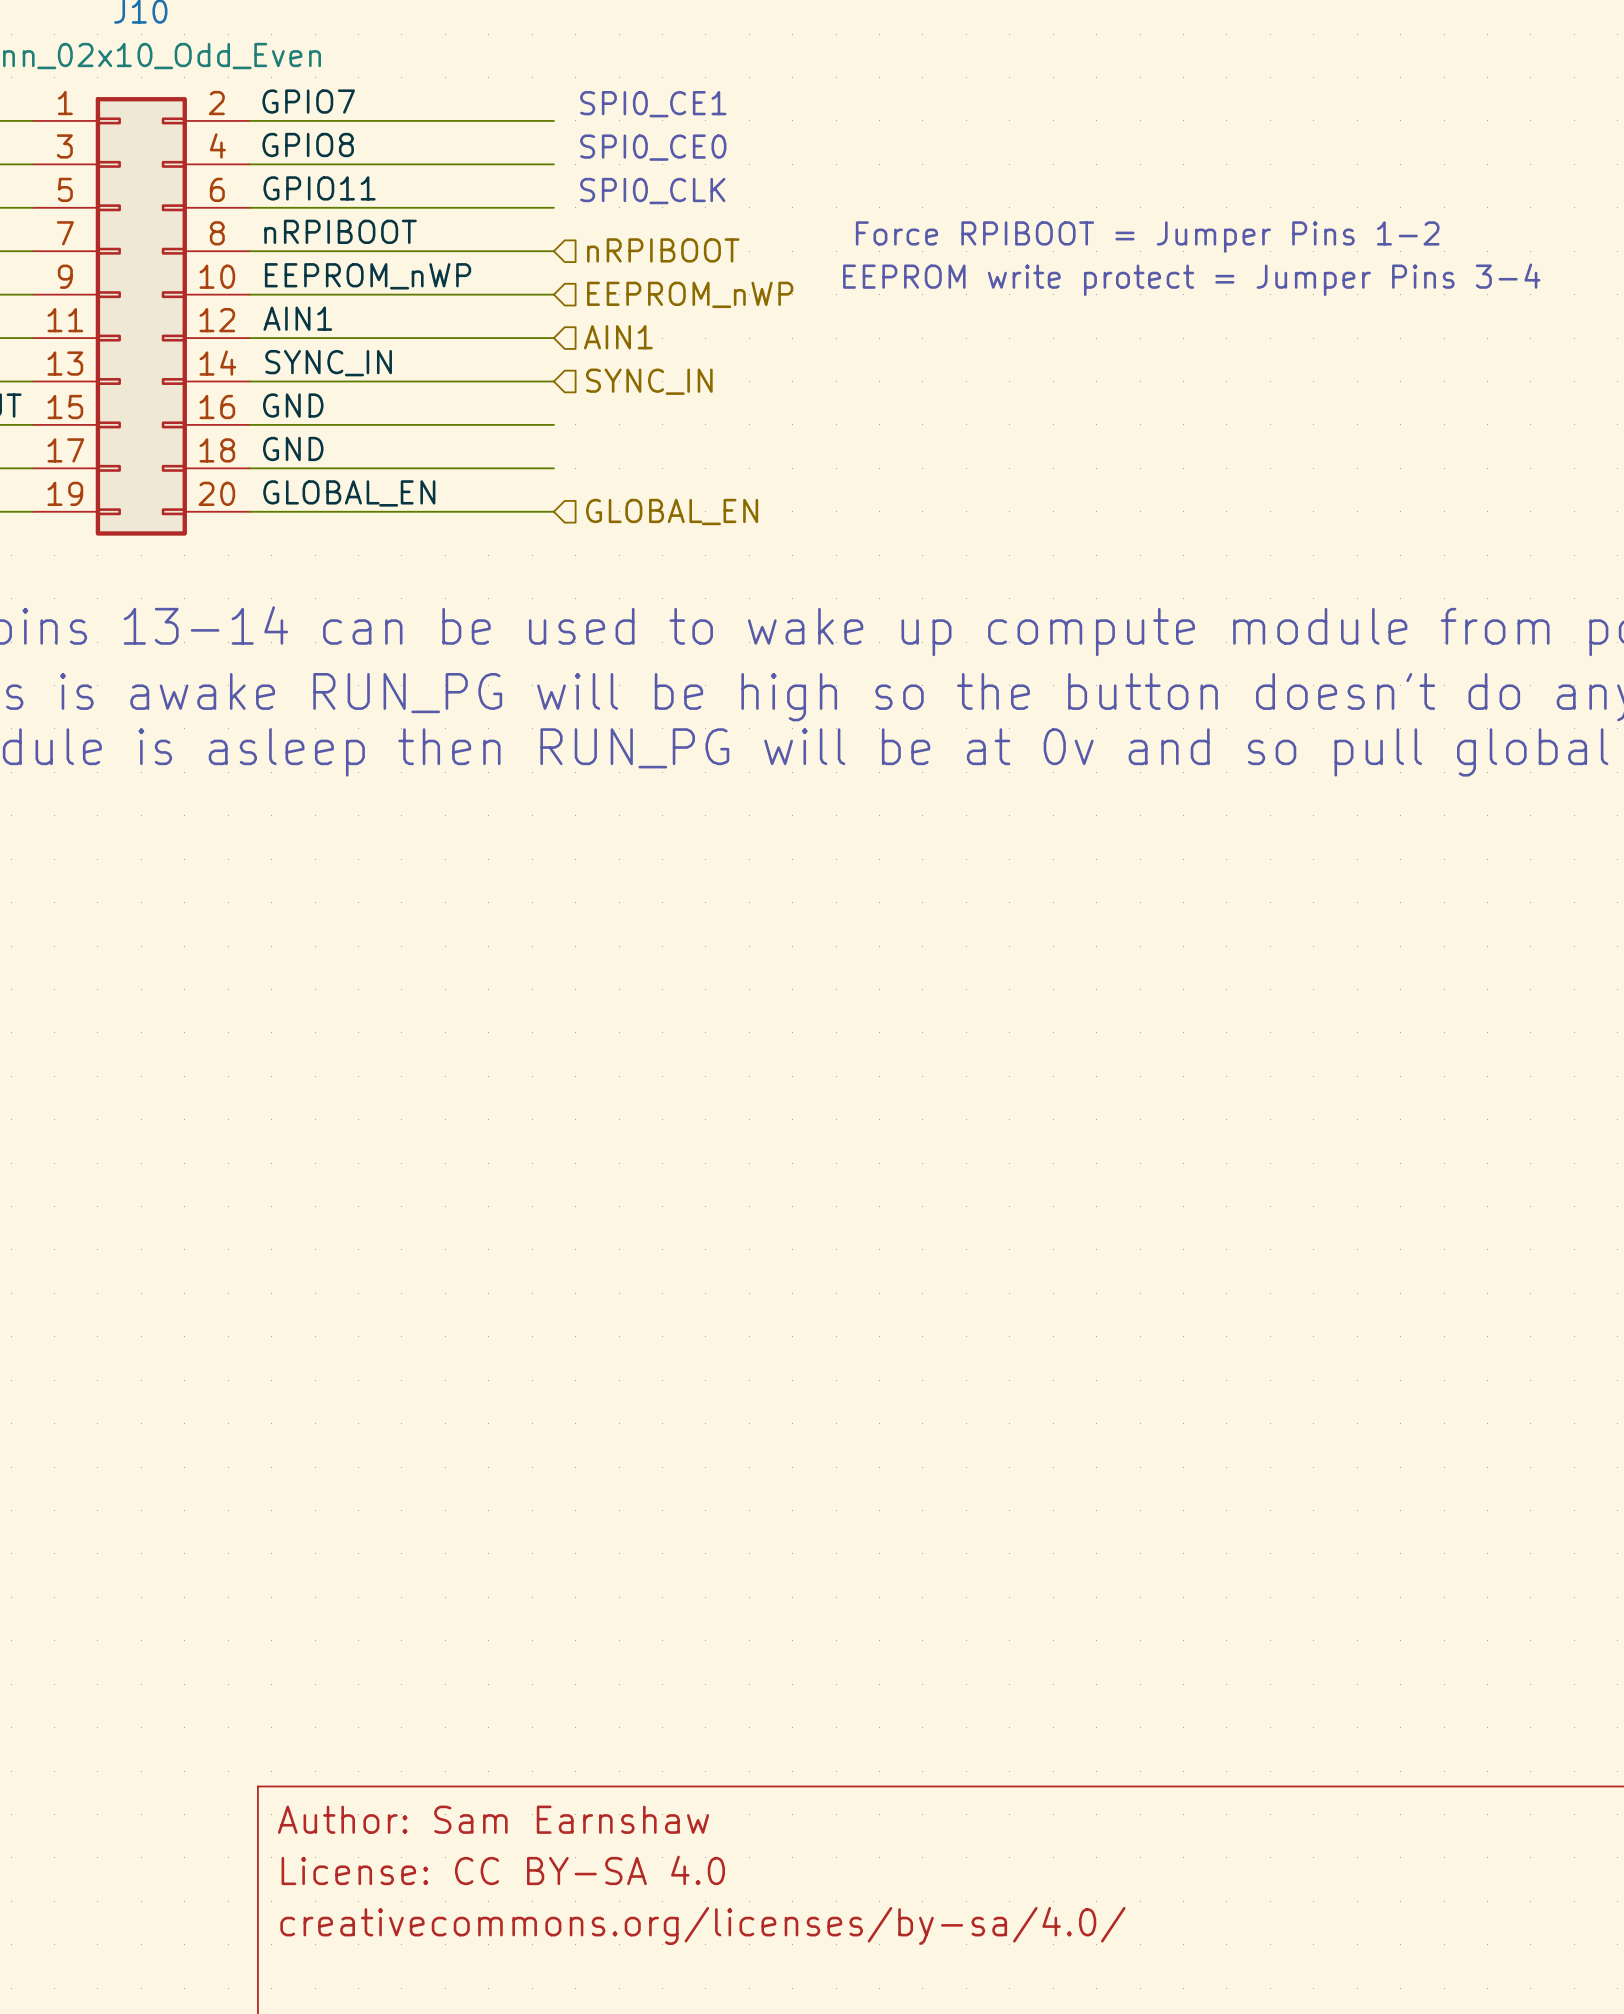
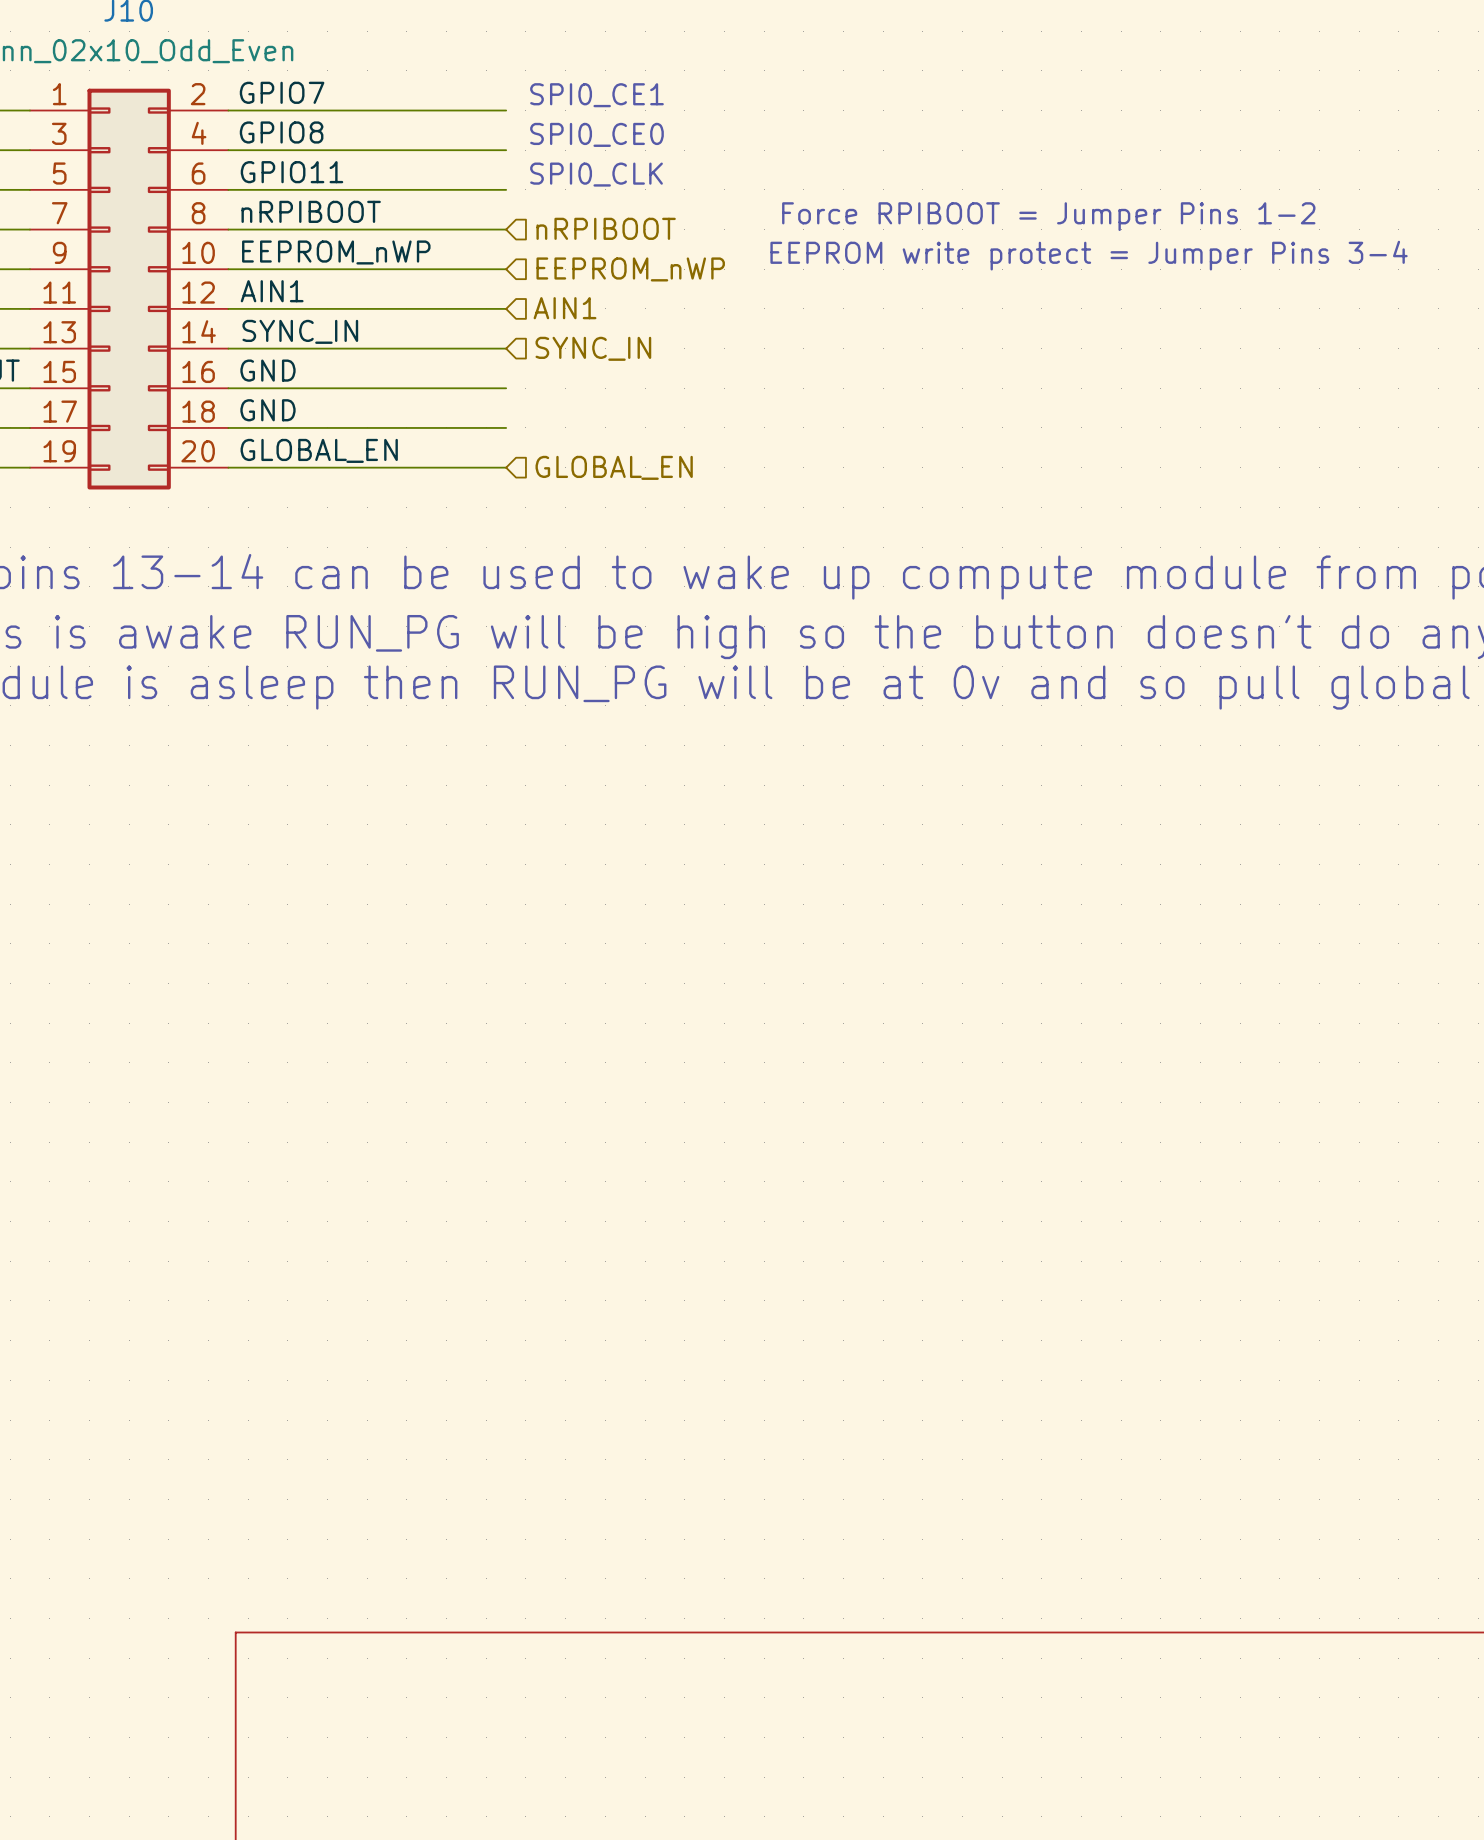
title block: Author: Sam Earnshaw (493, 1819) -> none
title block: License: CC BY-SA 4.0 (503, 1870) -> none
title block: creativecommons.org/licenses/by-sa/4.0/ (702, 1925) -> none

